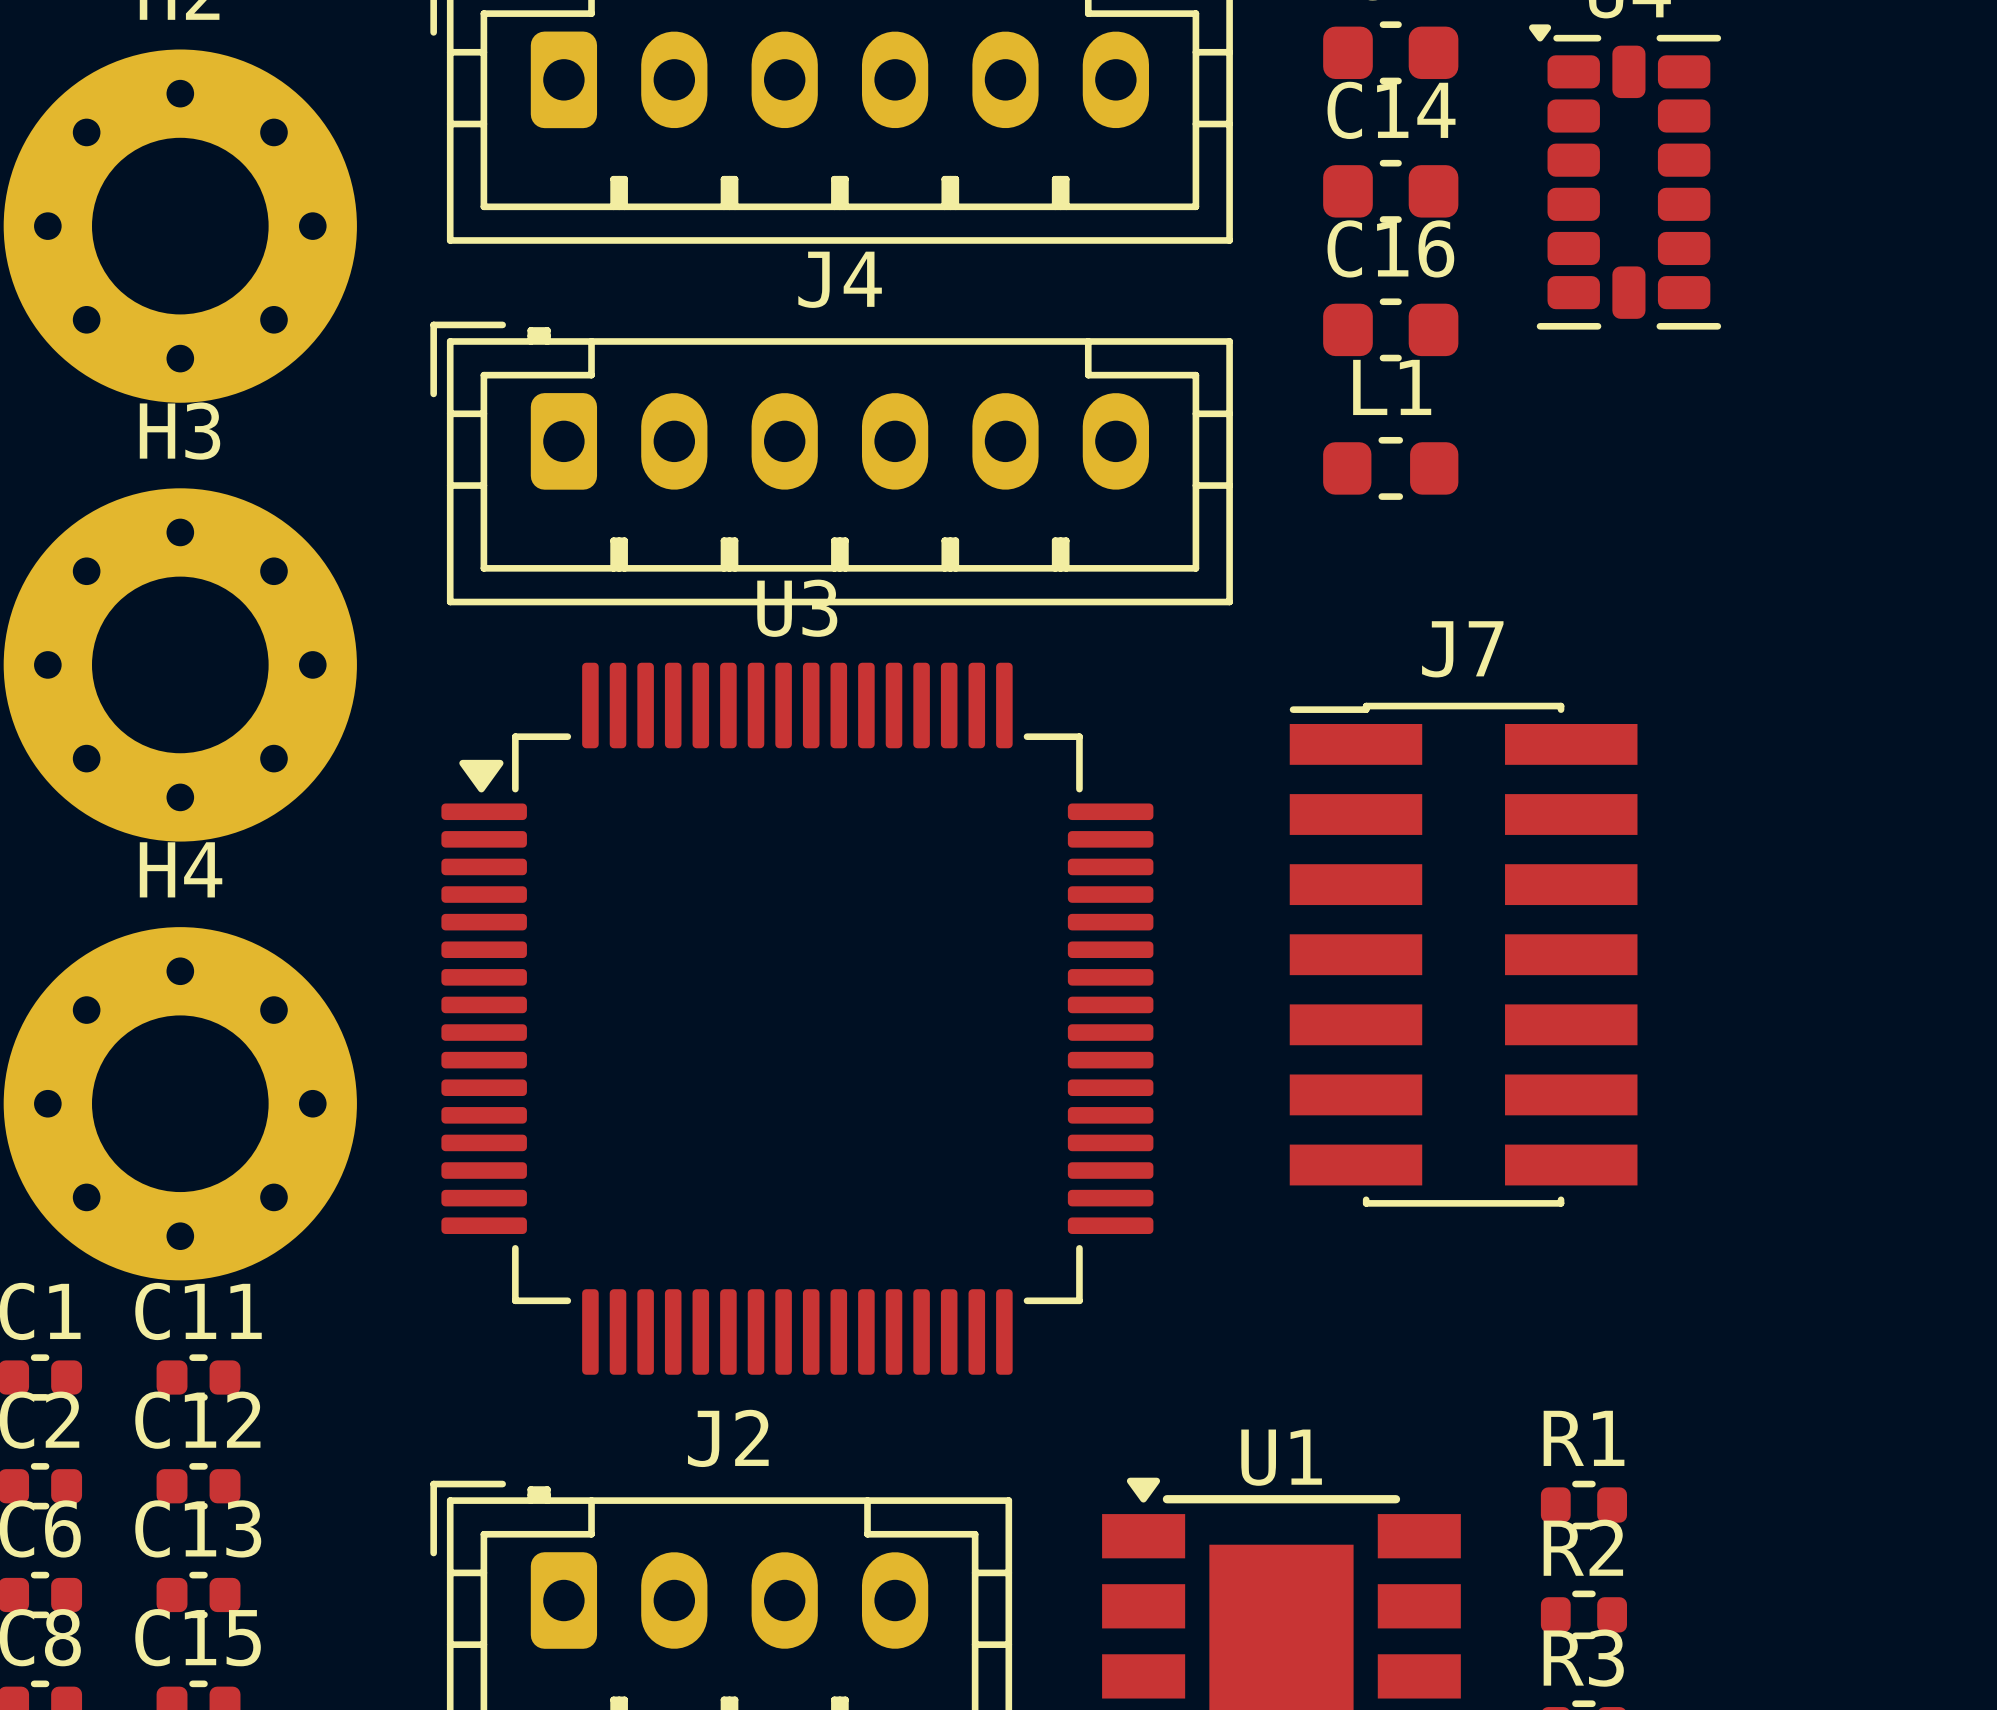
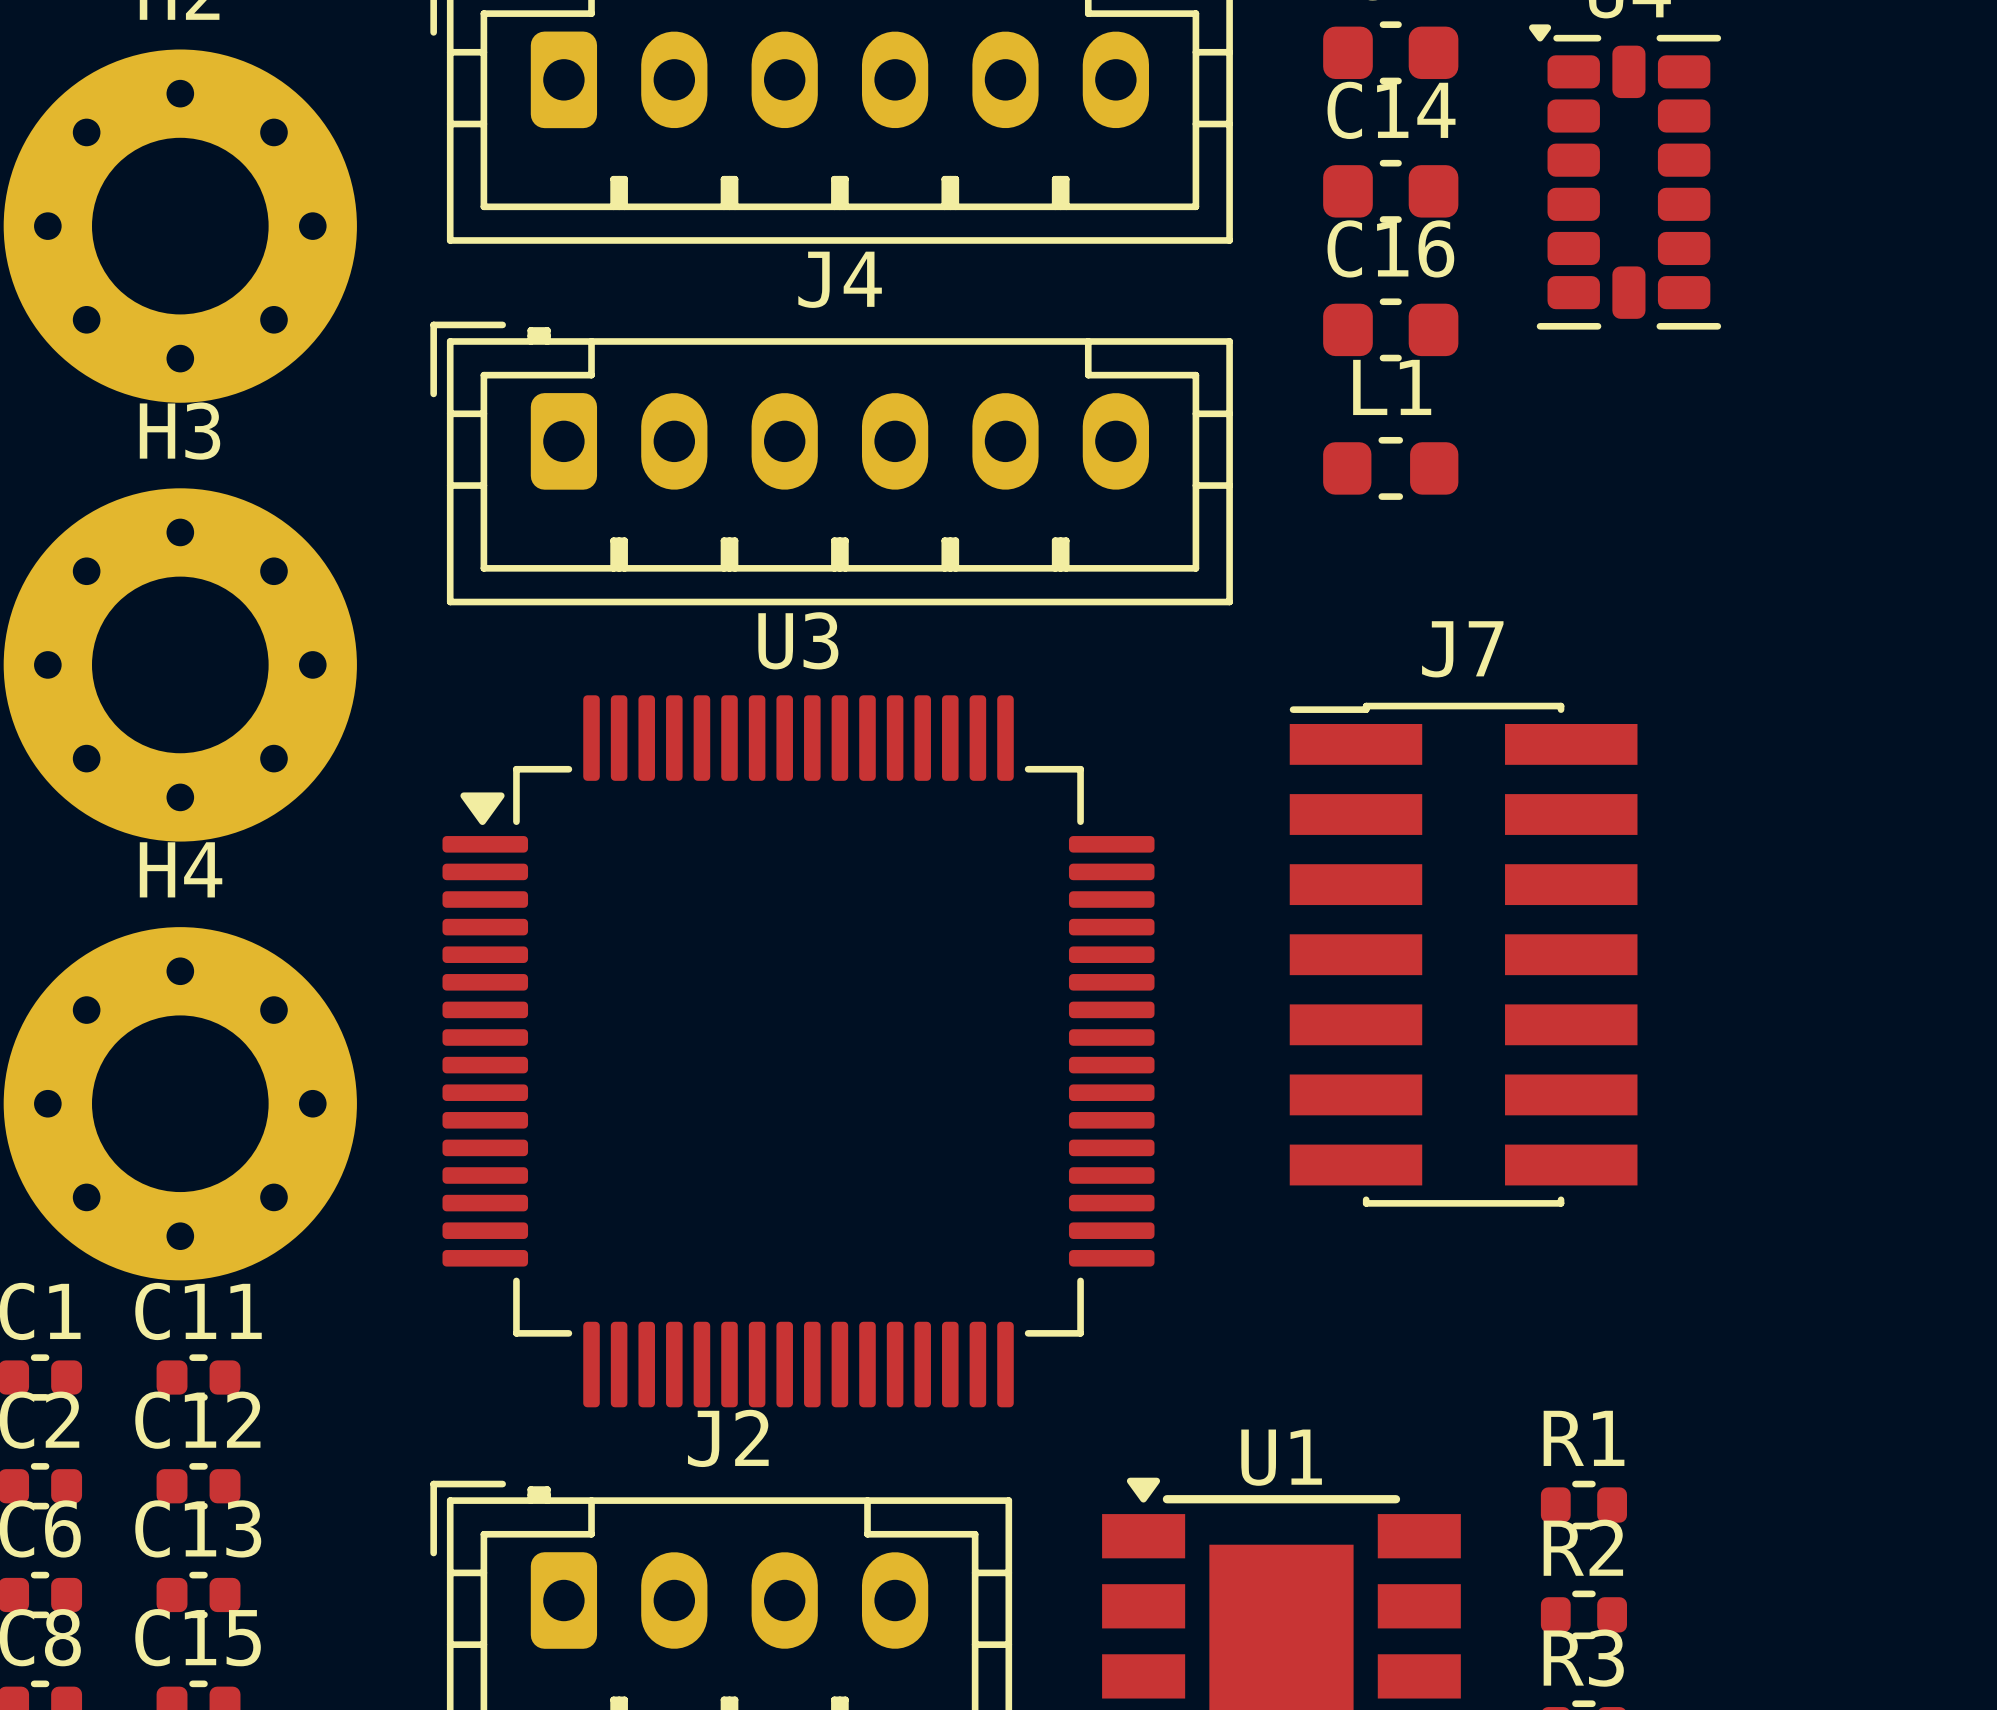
U3 position: (797, 1018) -> (798, 1051)

